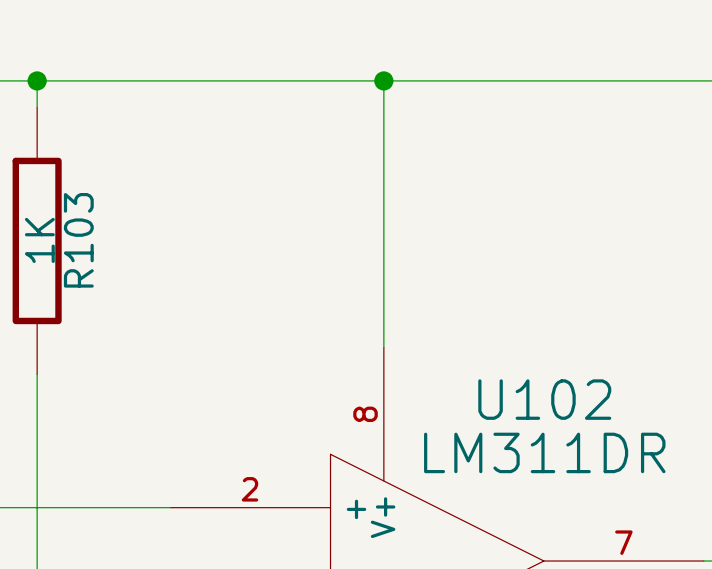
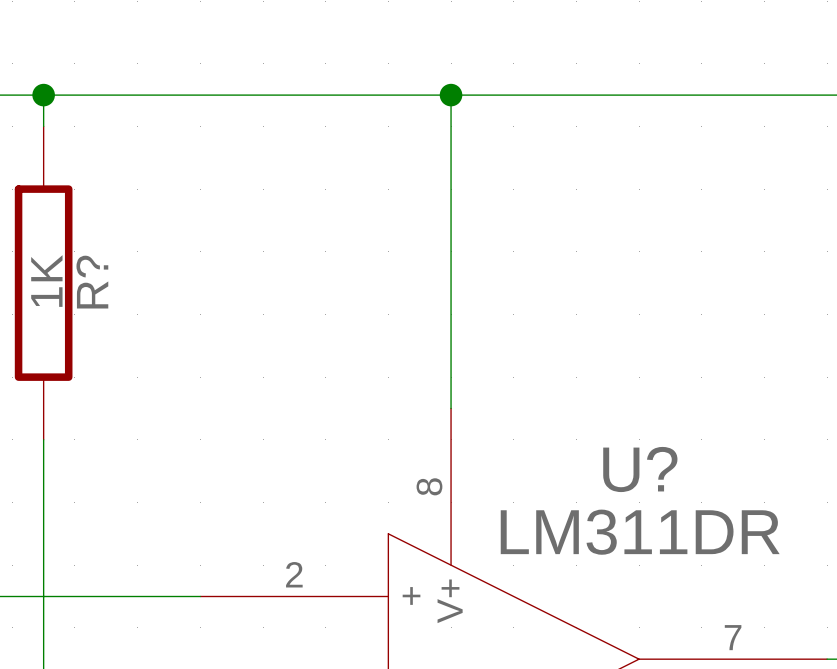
R103 name: R103 (78, 240) -> R? (92, 282)
U102 name: U102 (544, 399) -> U? (640, 469)

